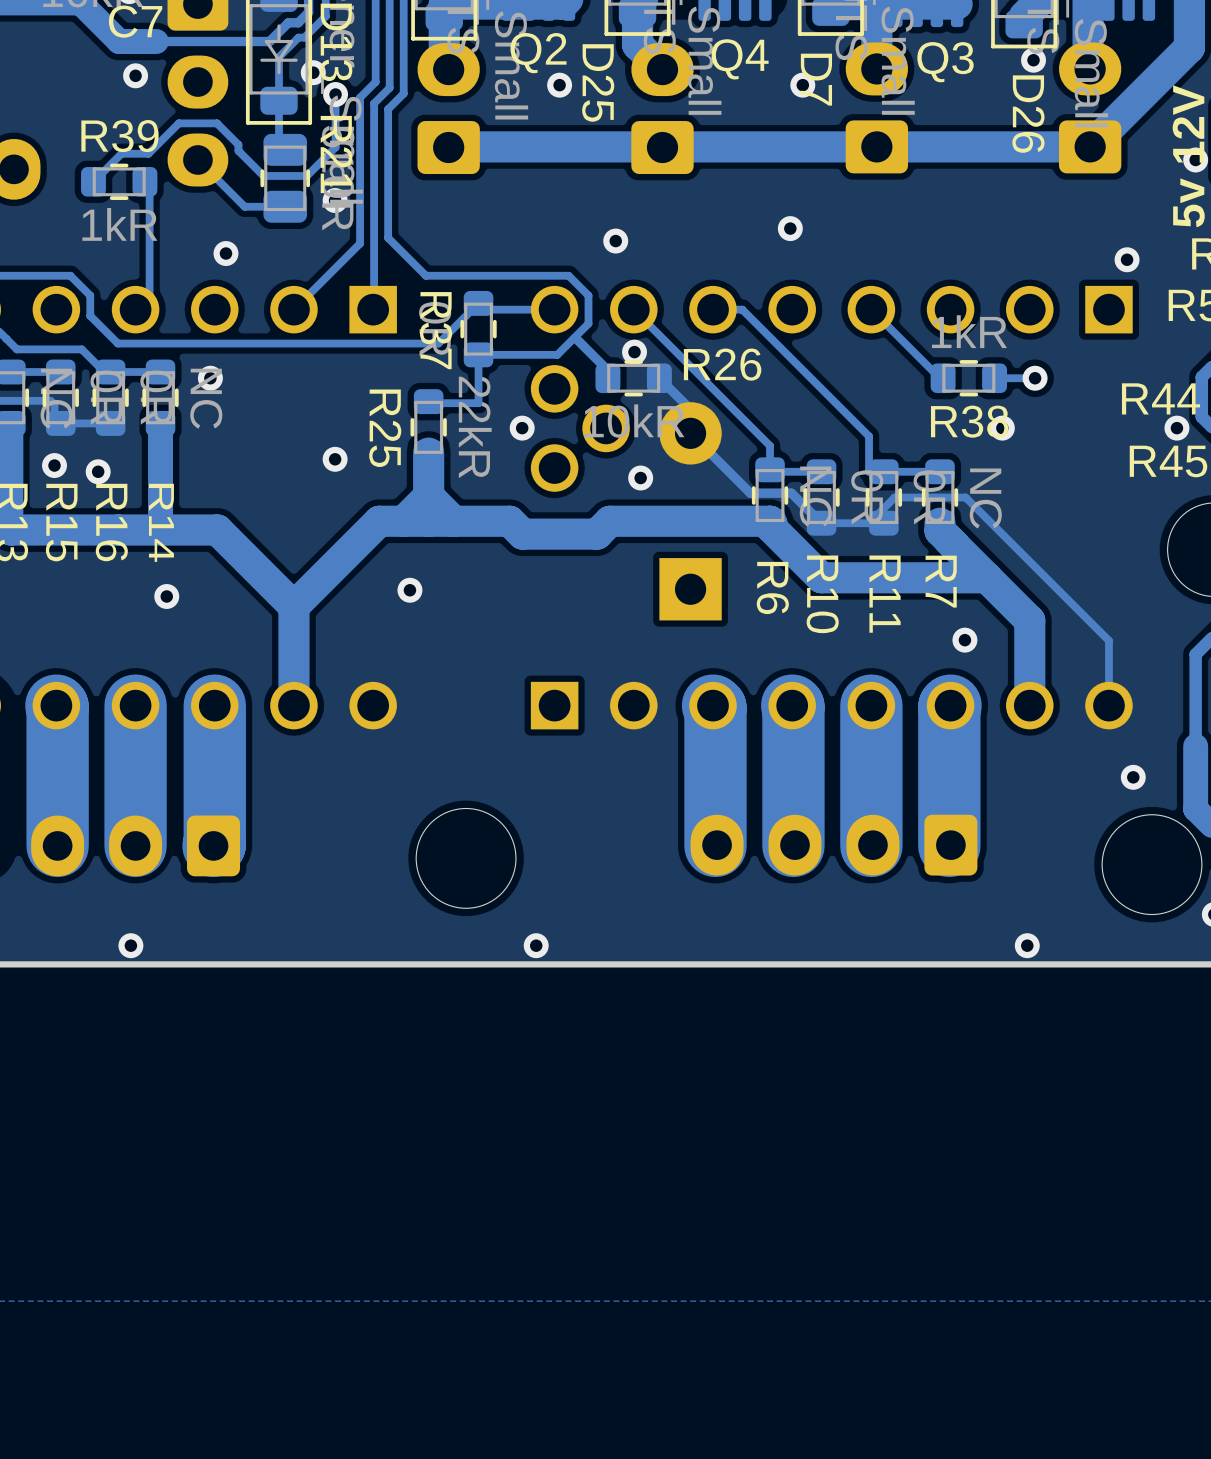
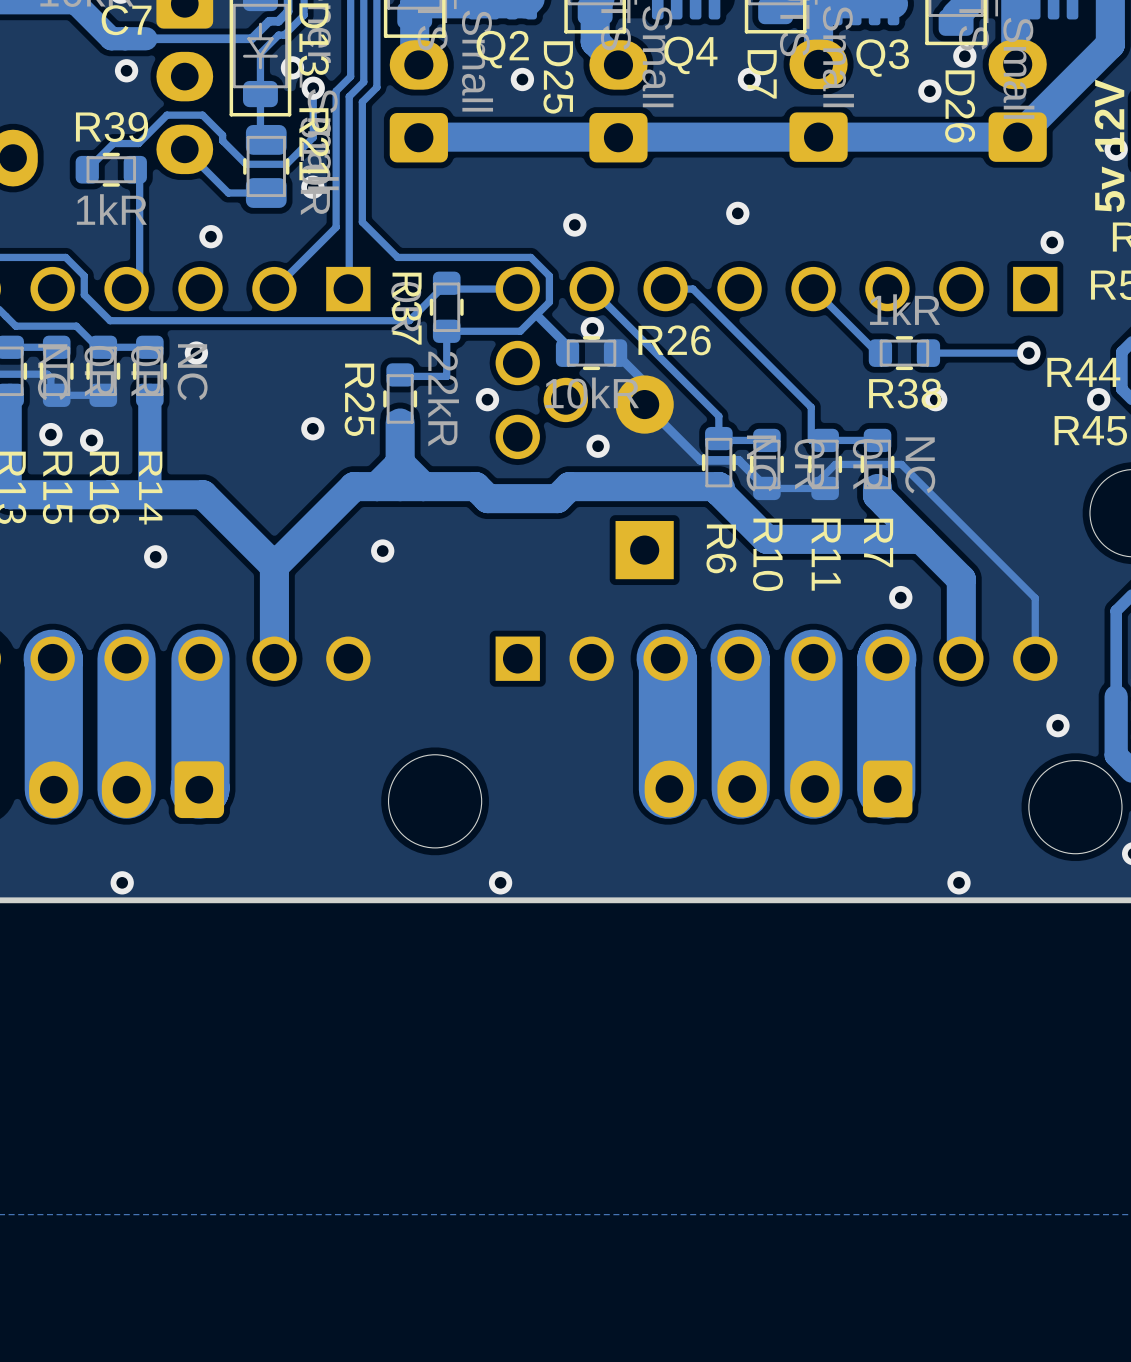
via: none -> (929, 91)
via position: (1035, 378) -> (1028, 353)
track: none -> (1028, 353) (966, 353)

